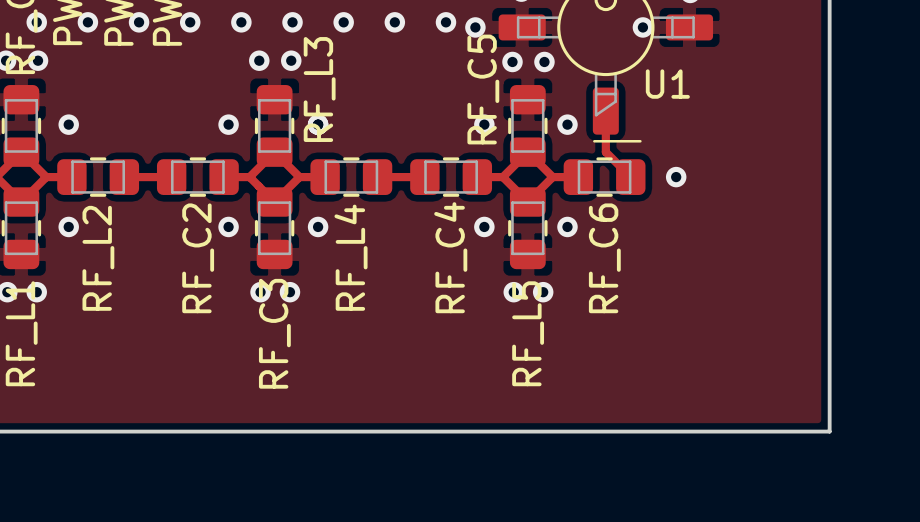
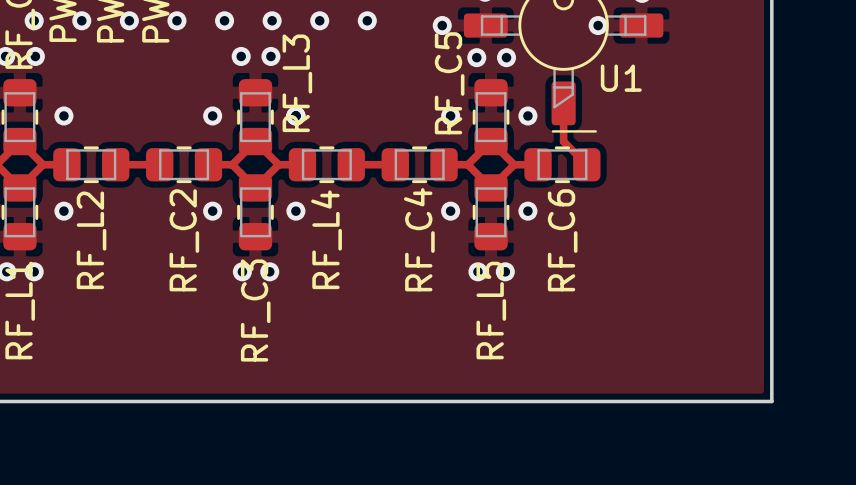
via: (445, 22) -> none
via: (676, 177) -> none

